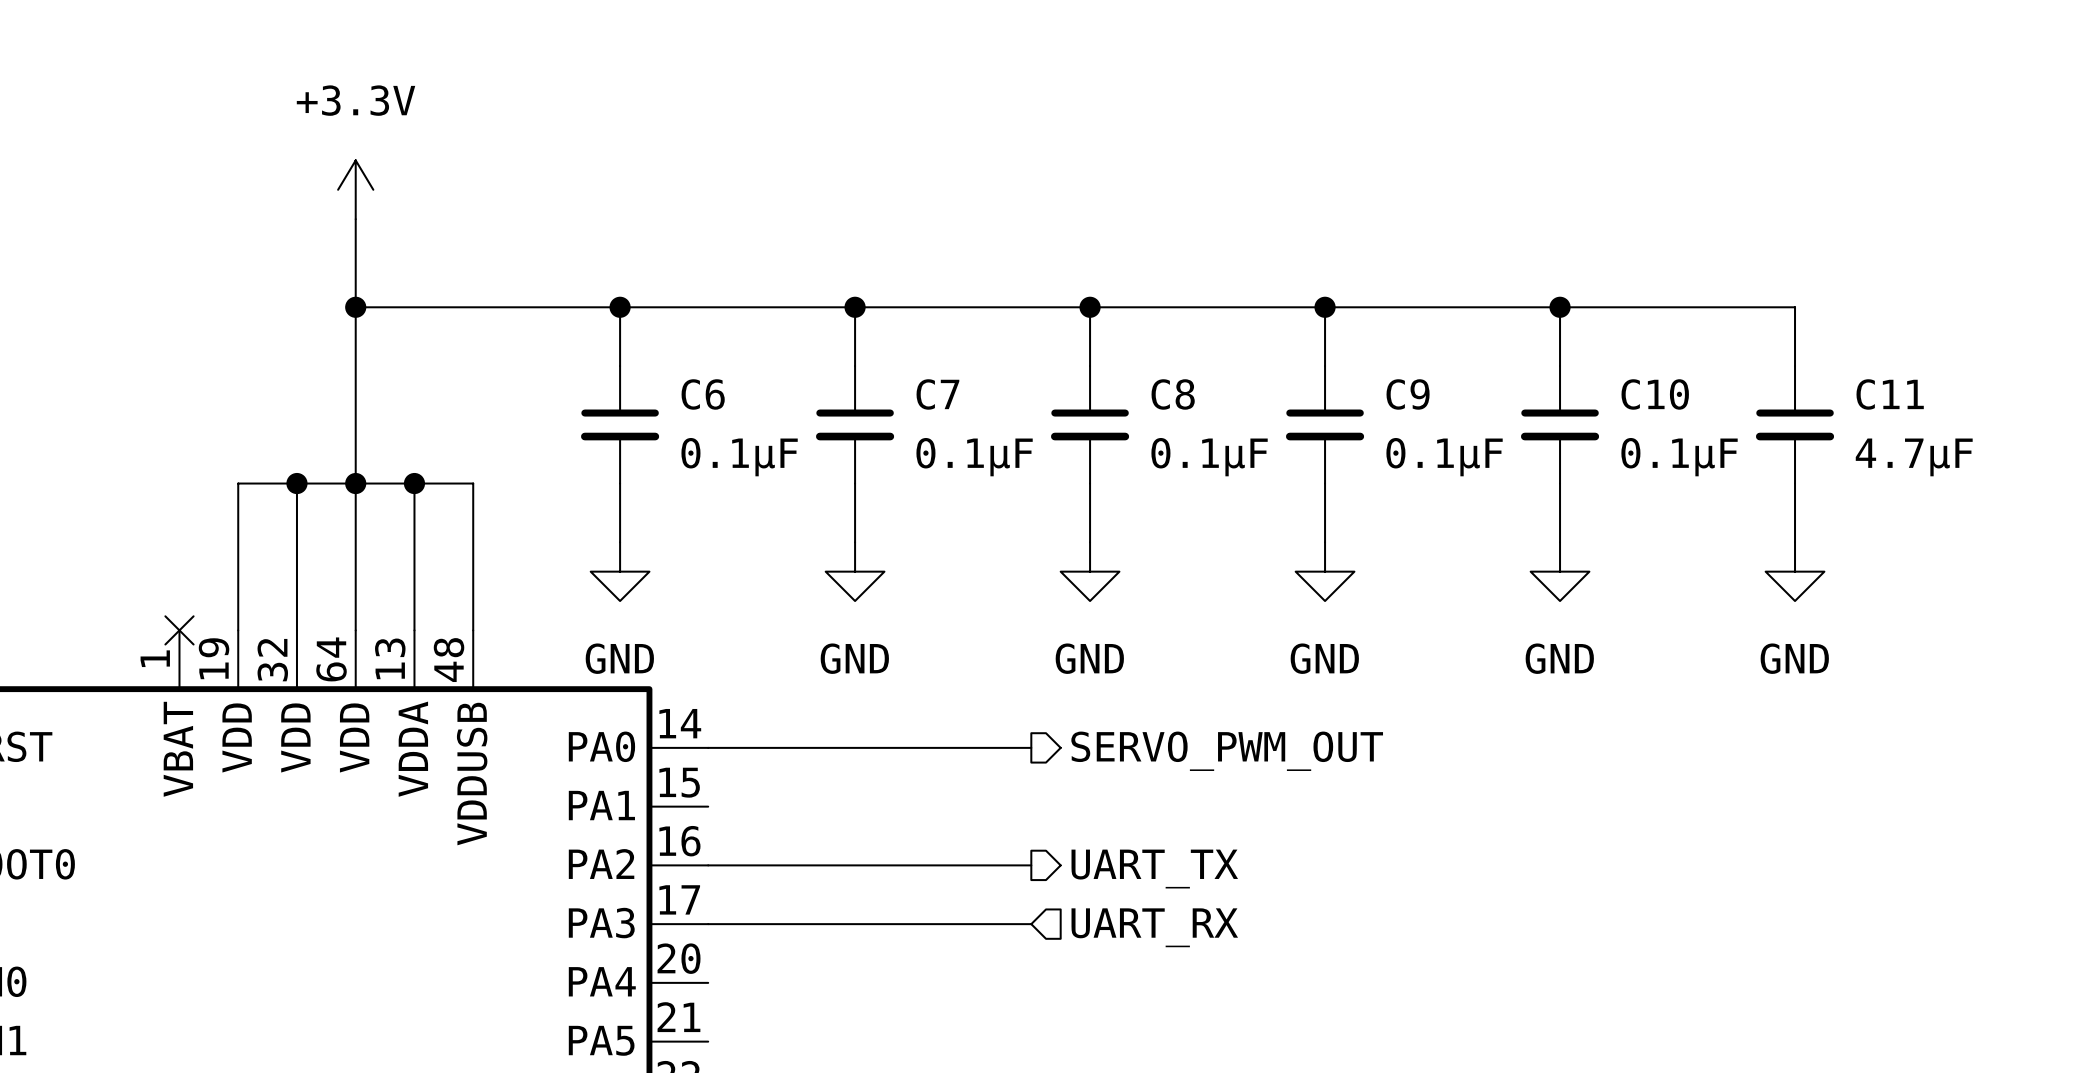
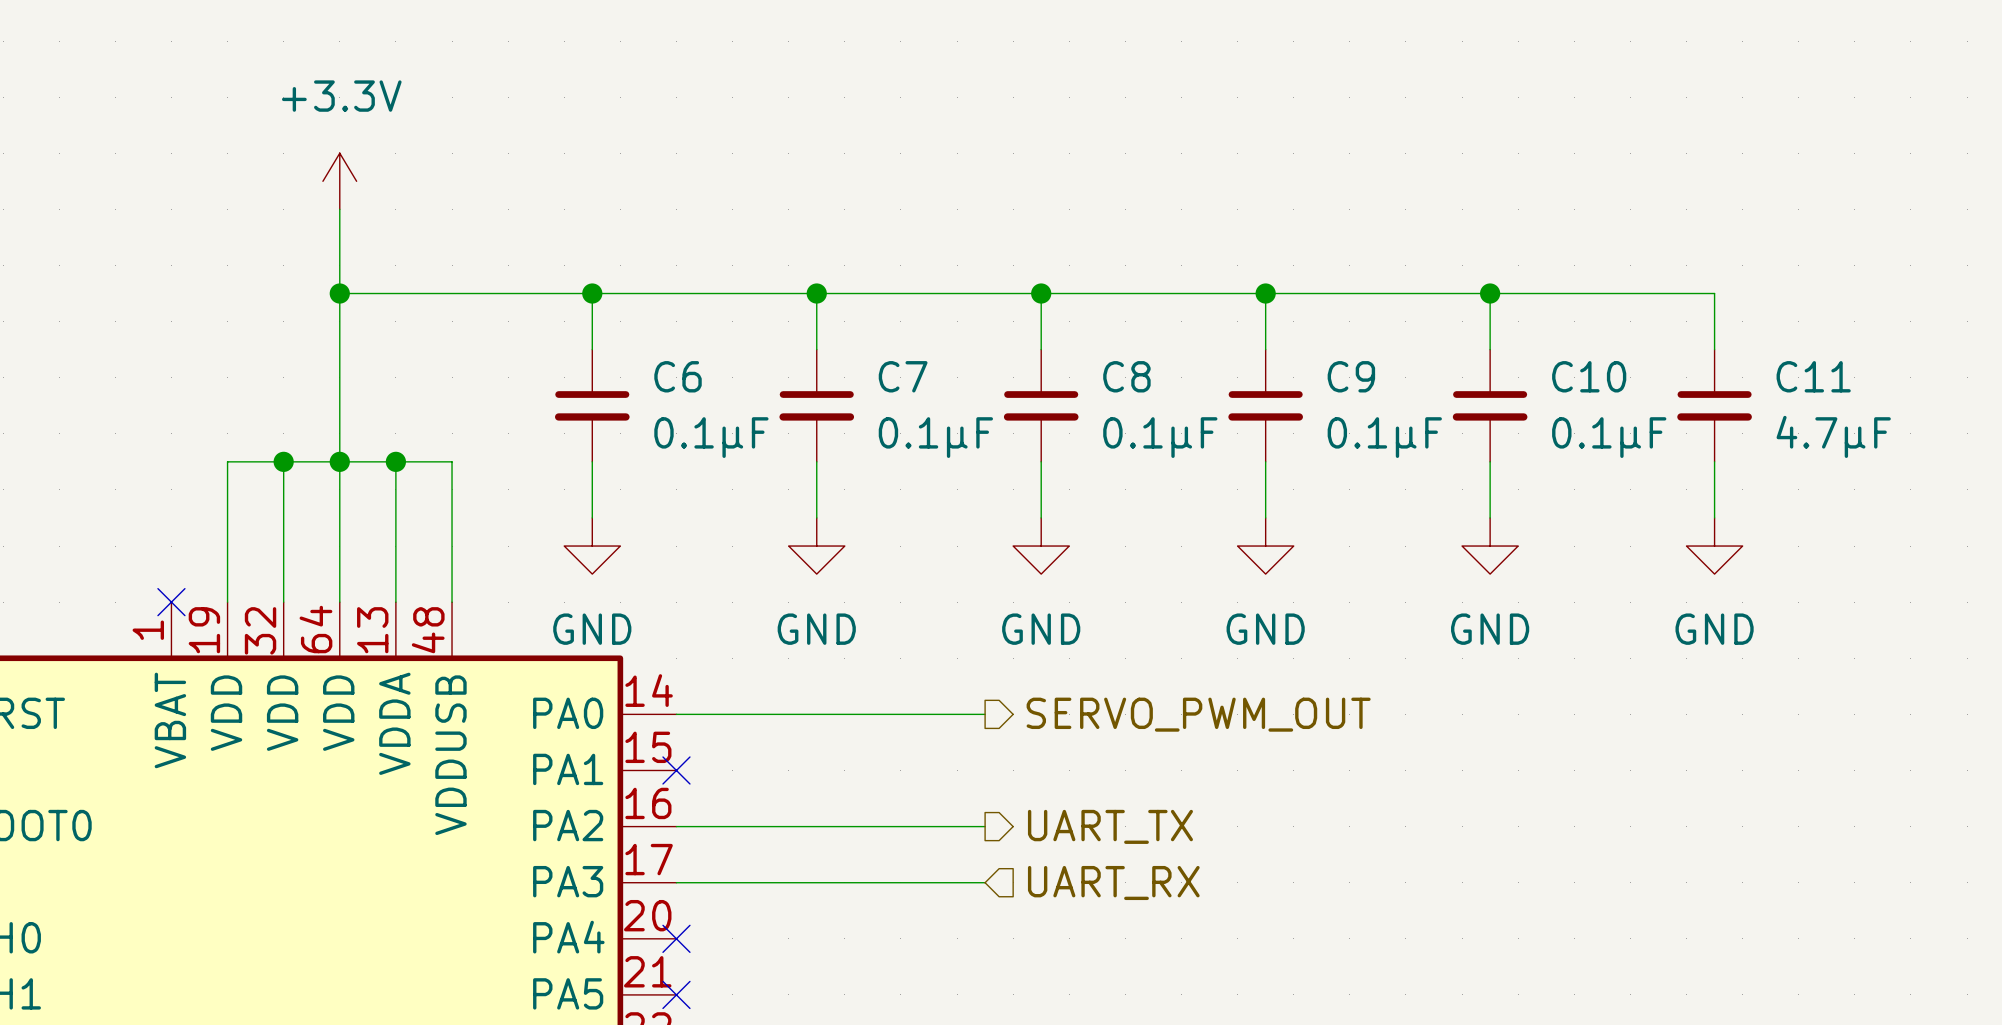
no-connect mark: none -> (676, 770)
no-connect mark: none -> (676, 938)
no-connect mark: none -> (676, 994)

